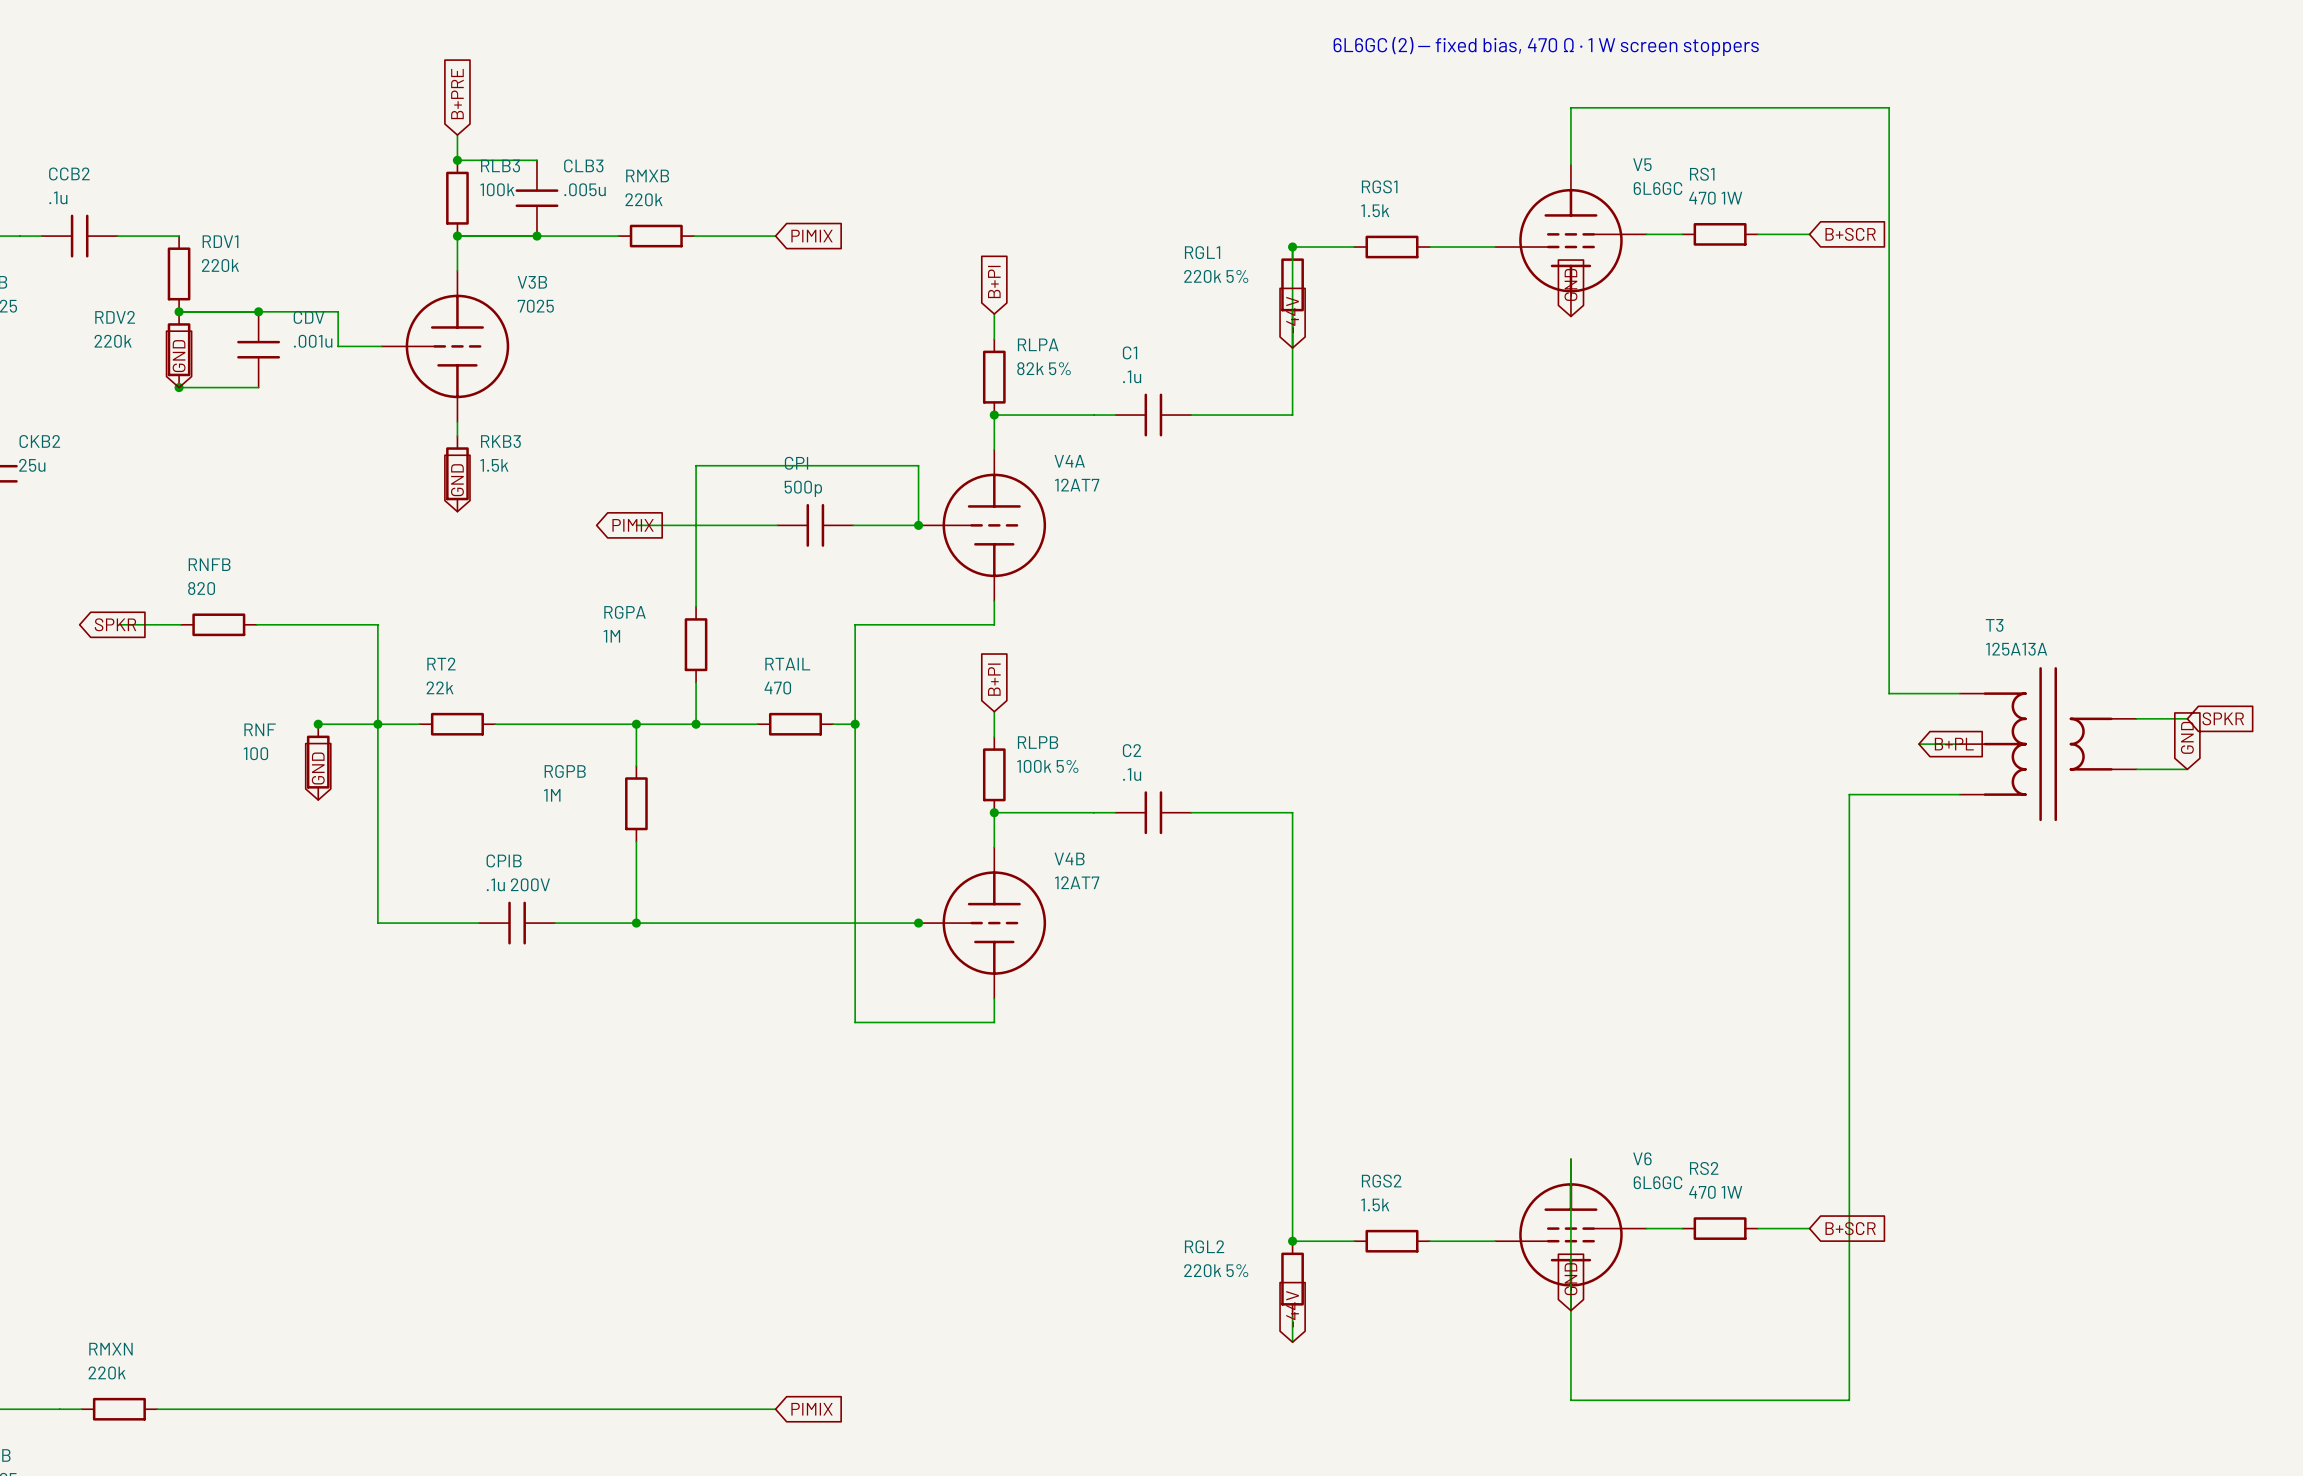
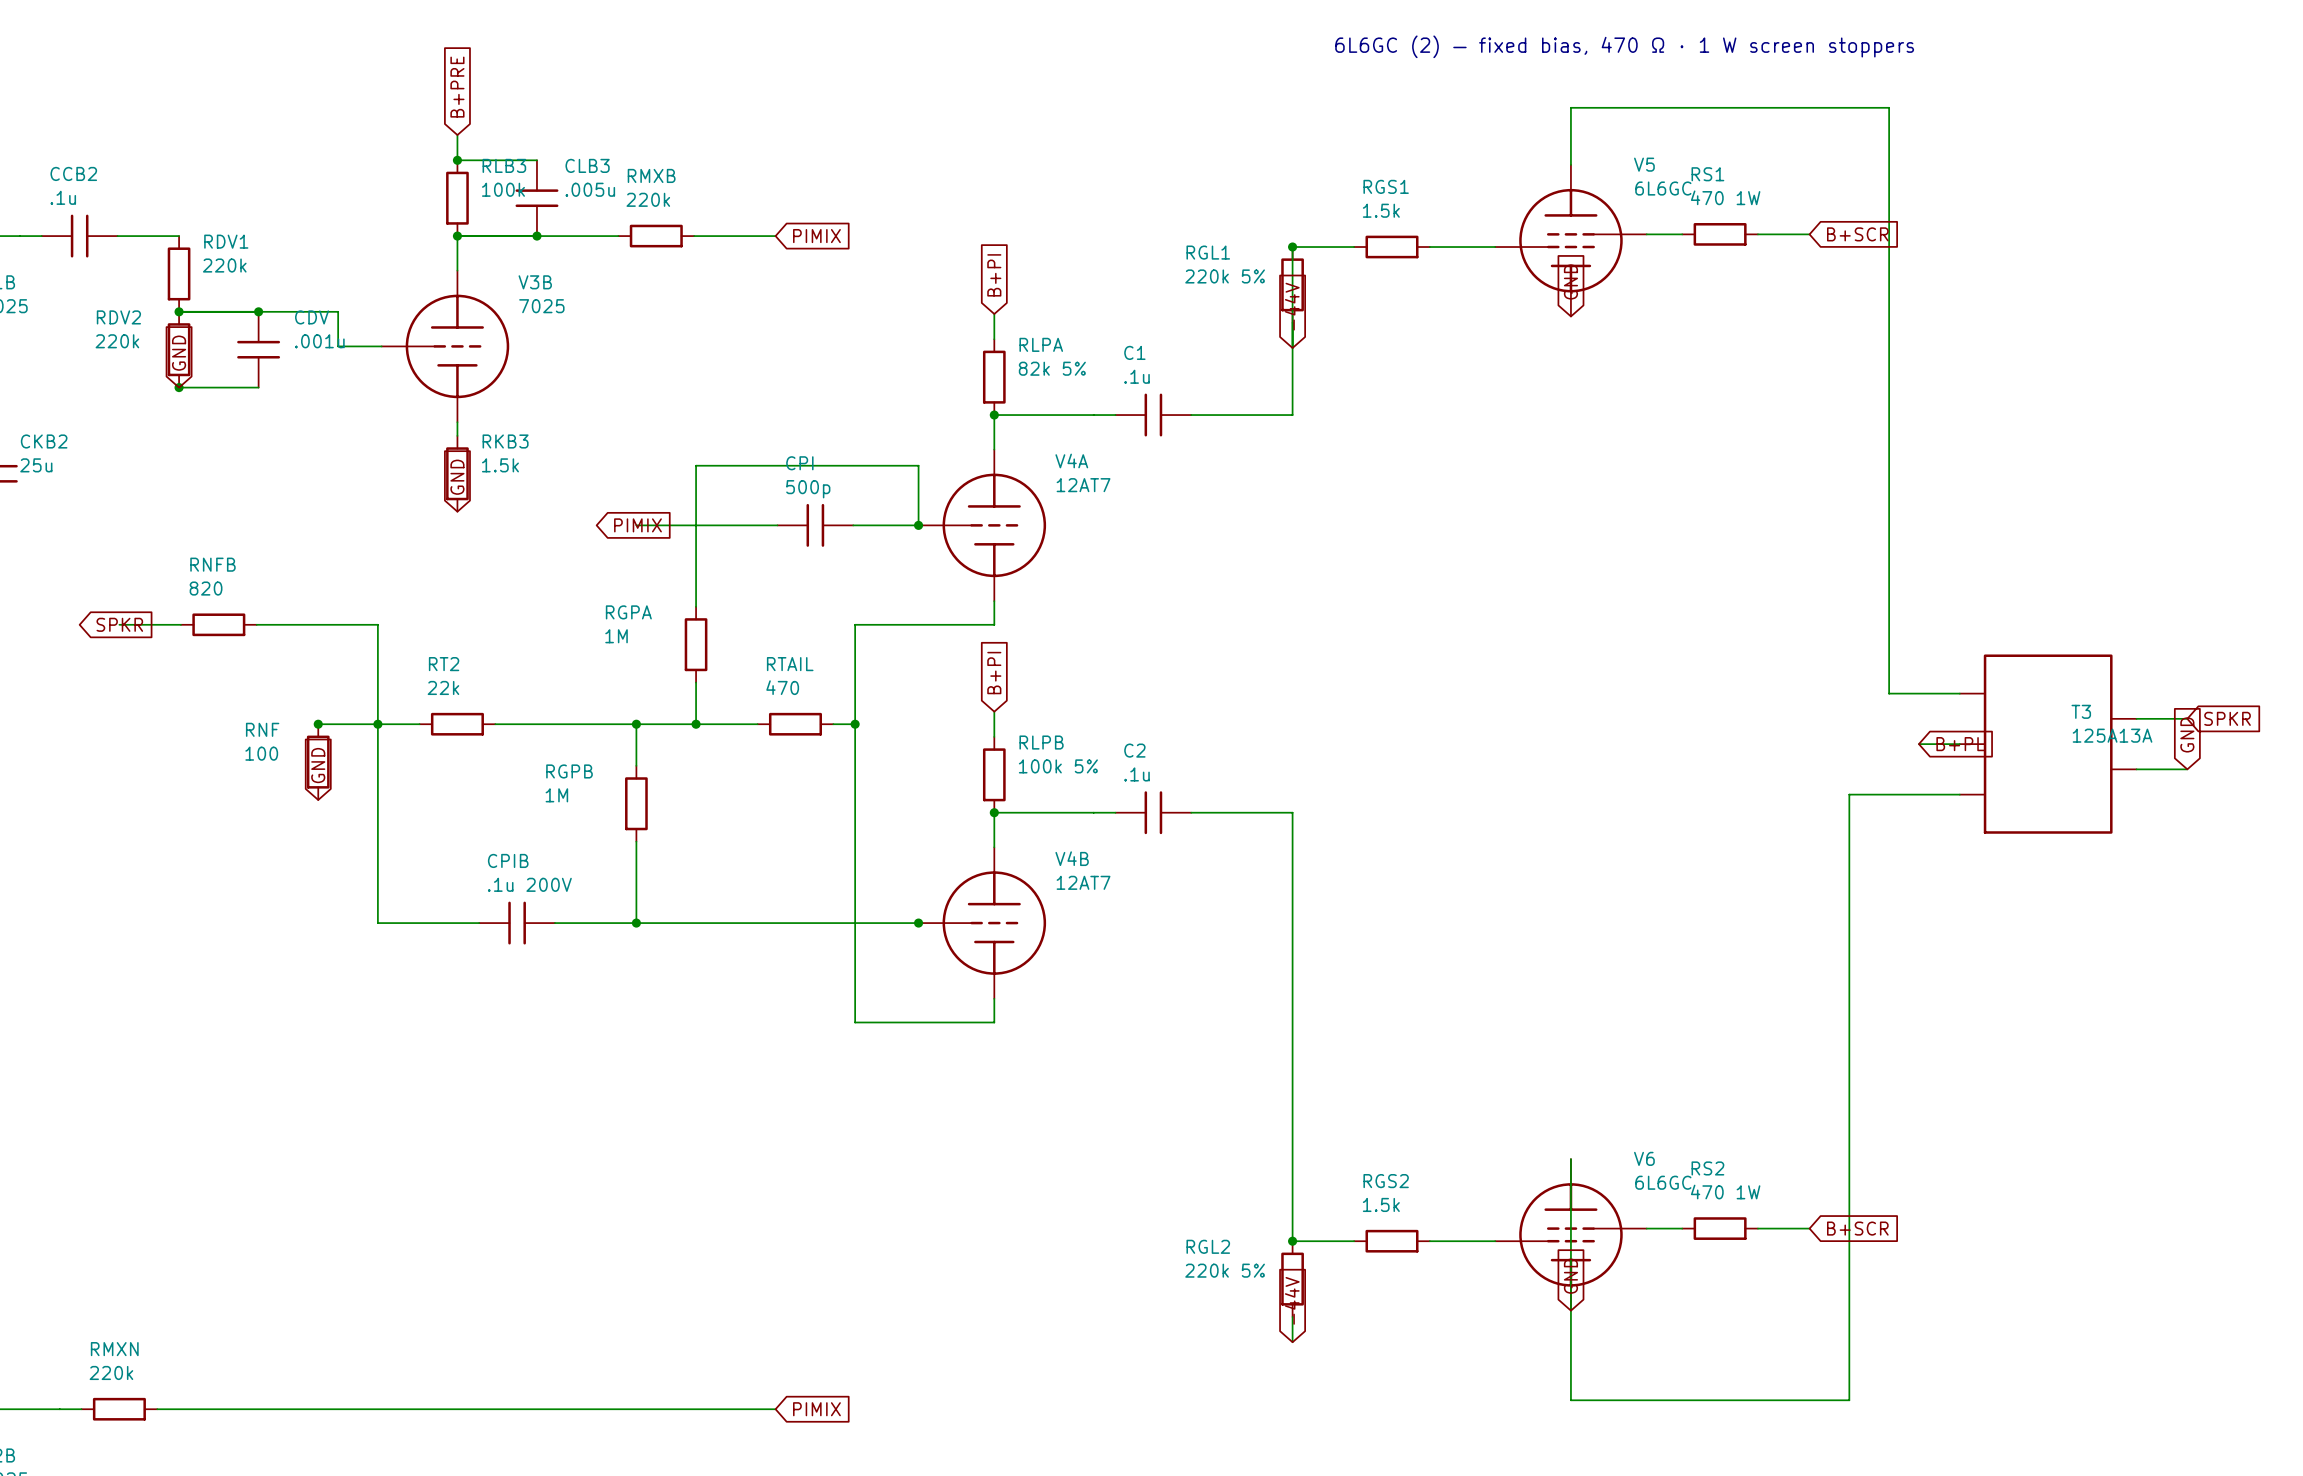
T3 name position: T3 (1994, 625) -> T3 (2081, 711)
T3 value position: 125A13A (2016, 649) -> 125A13A (2112, 735)
T3 symbol: [1959, 667, 2137, 822] -> [1959, 654, 2137, 834]

